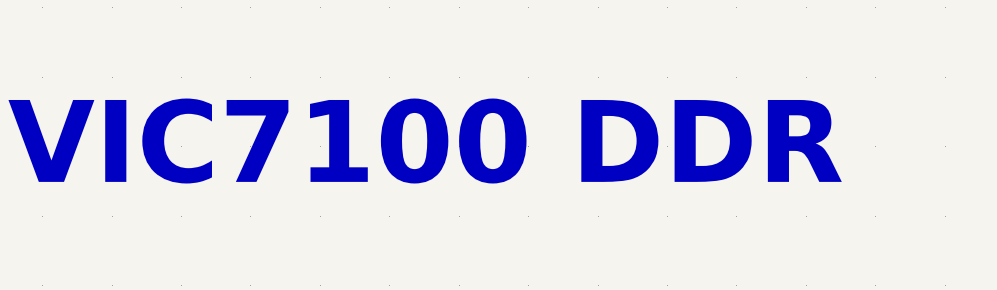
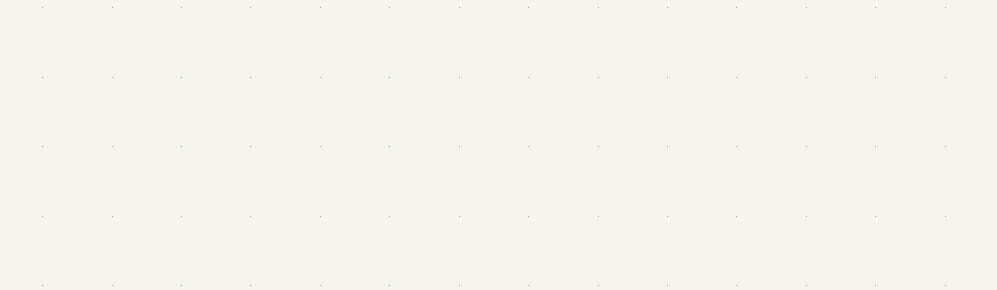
text: VIC7100 DDR (425, 141) -> none

